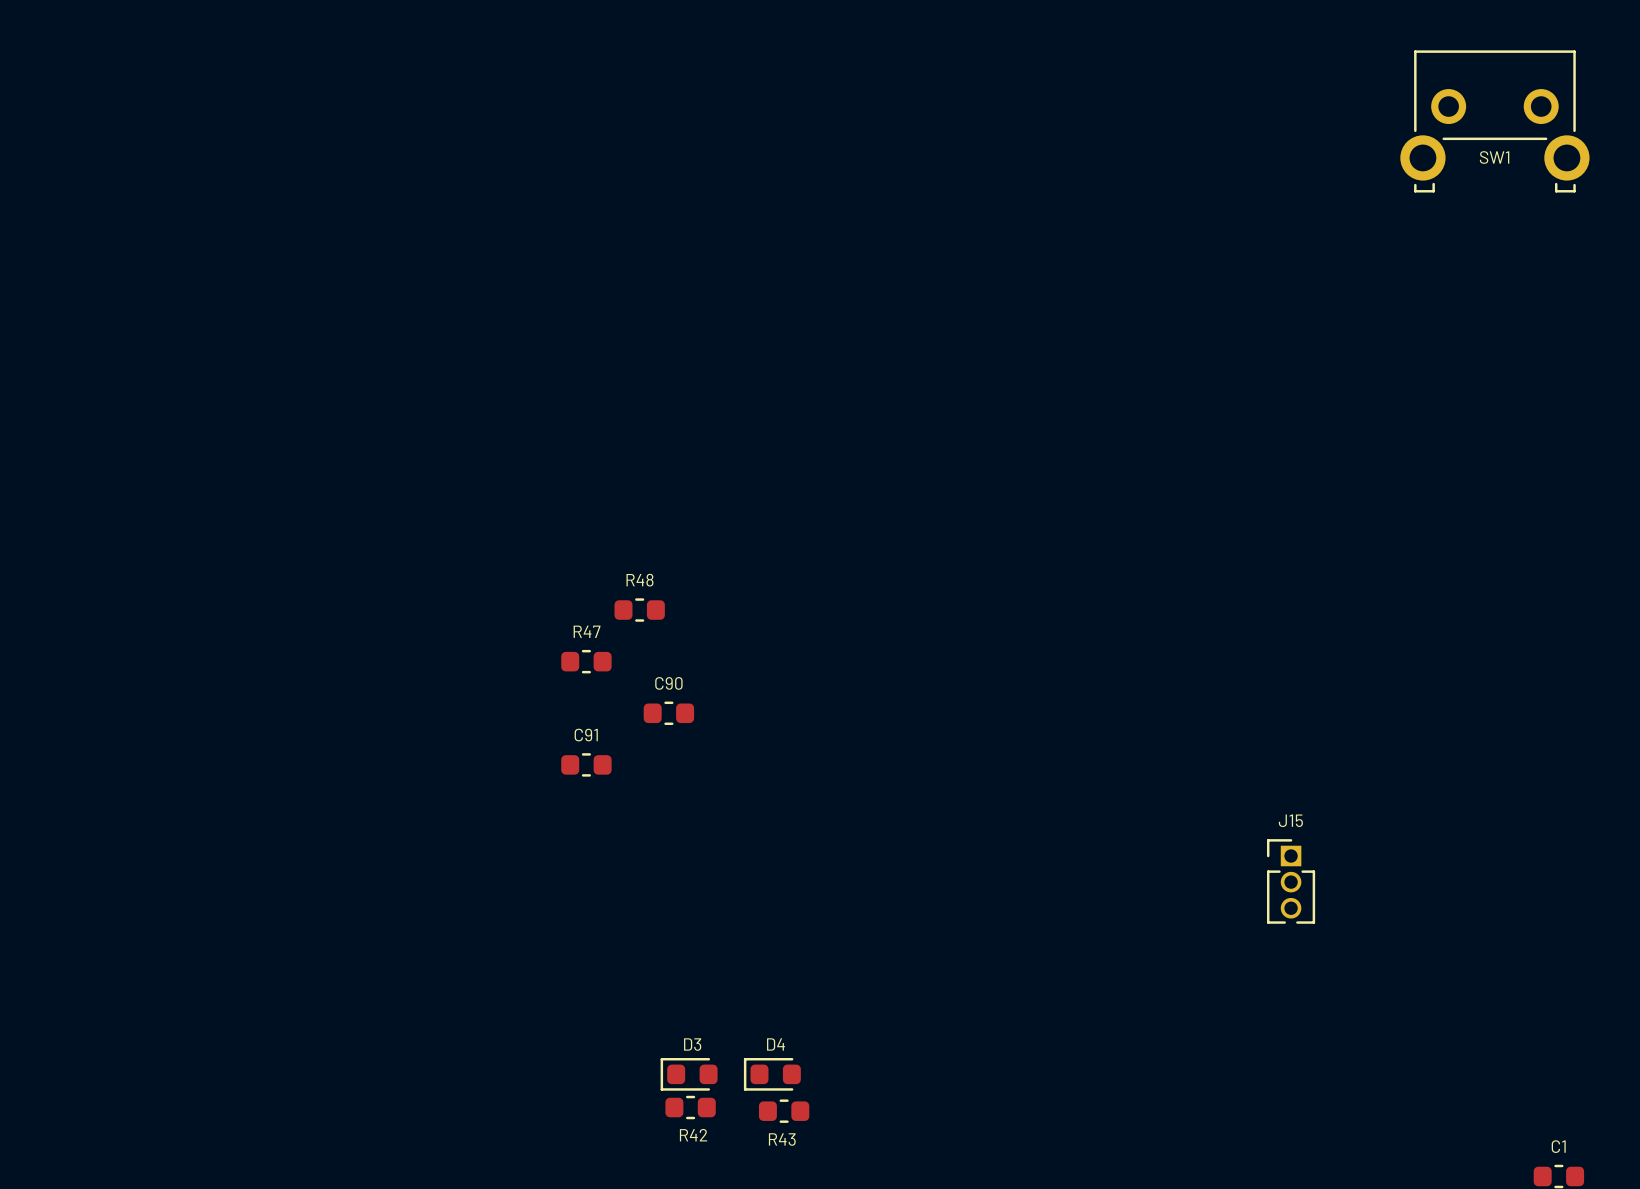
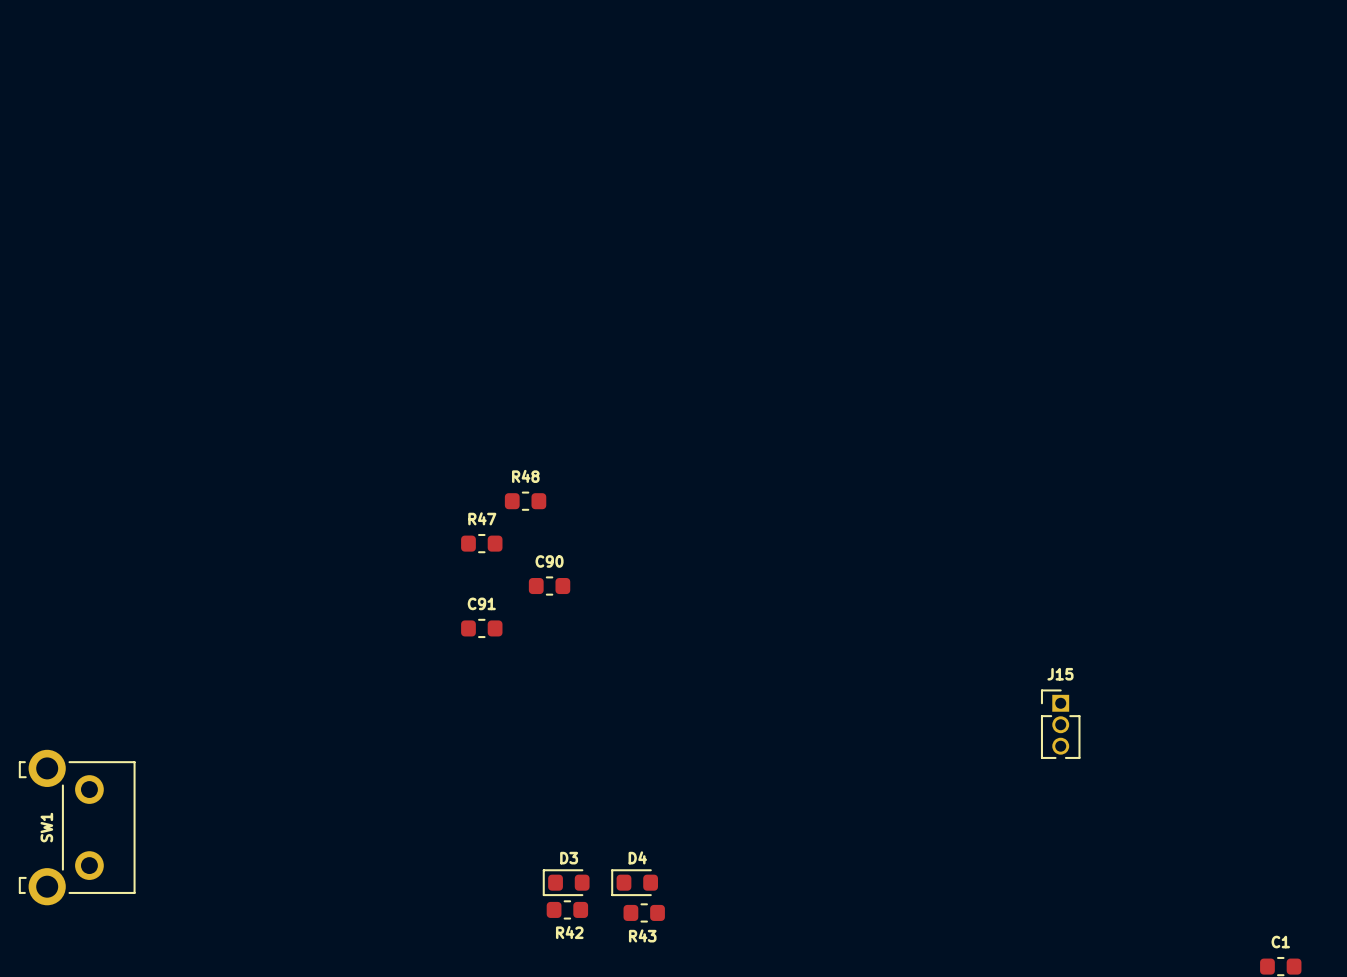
SW1 rotation: 0° (1494, 121) -> 90° clockwise (77, 827)
SW1 position: (1494, 121) -> (77, 827)

